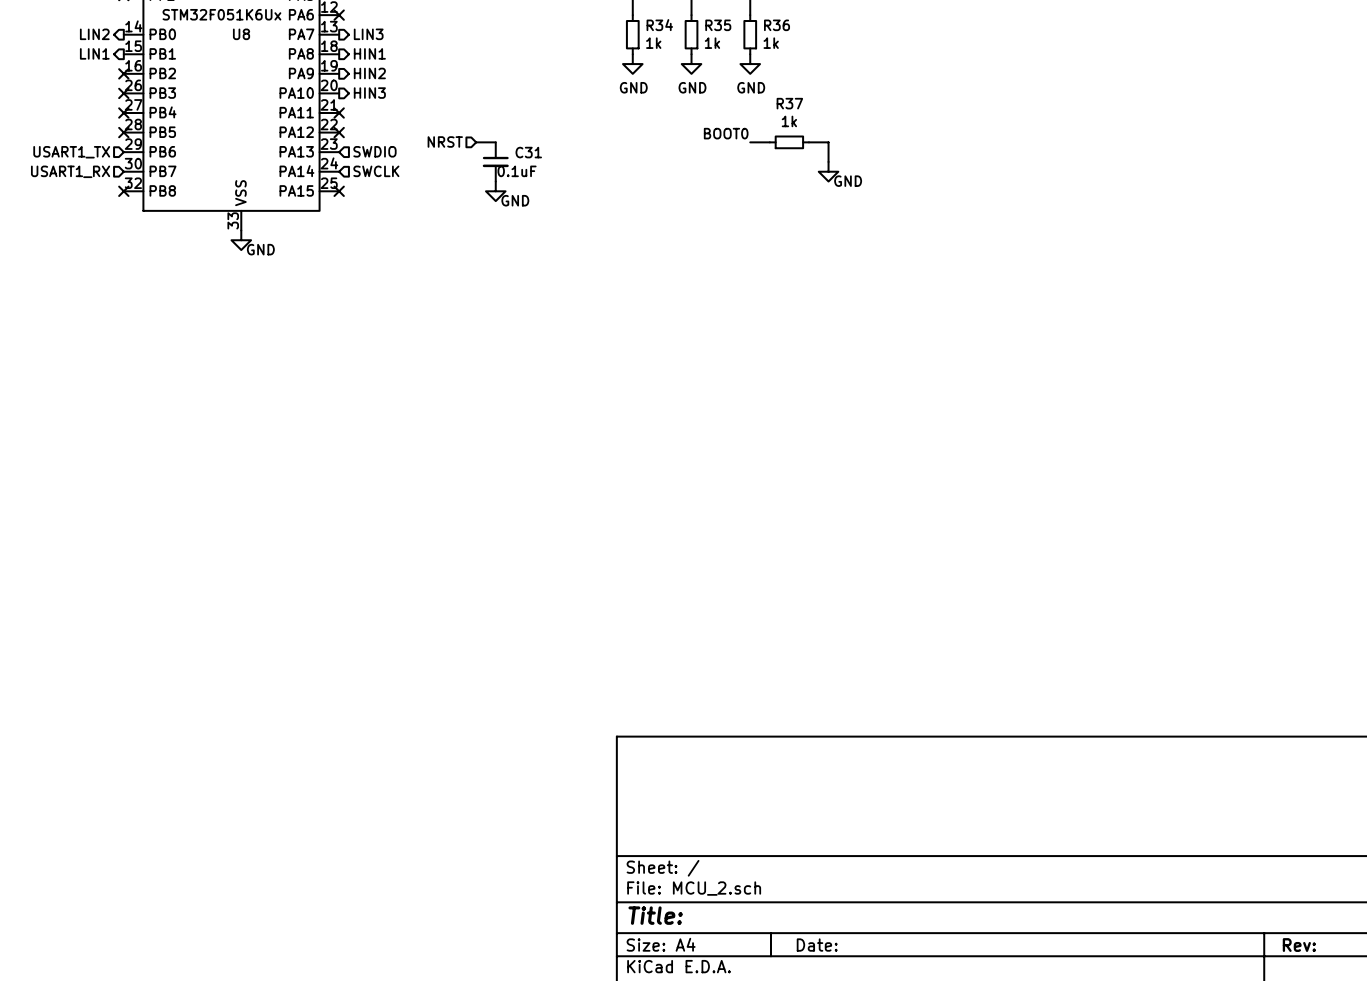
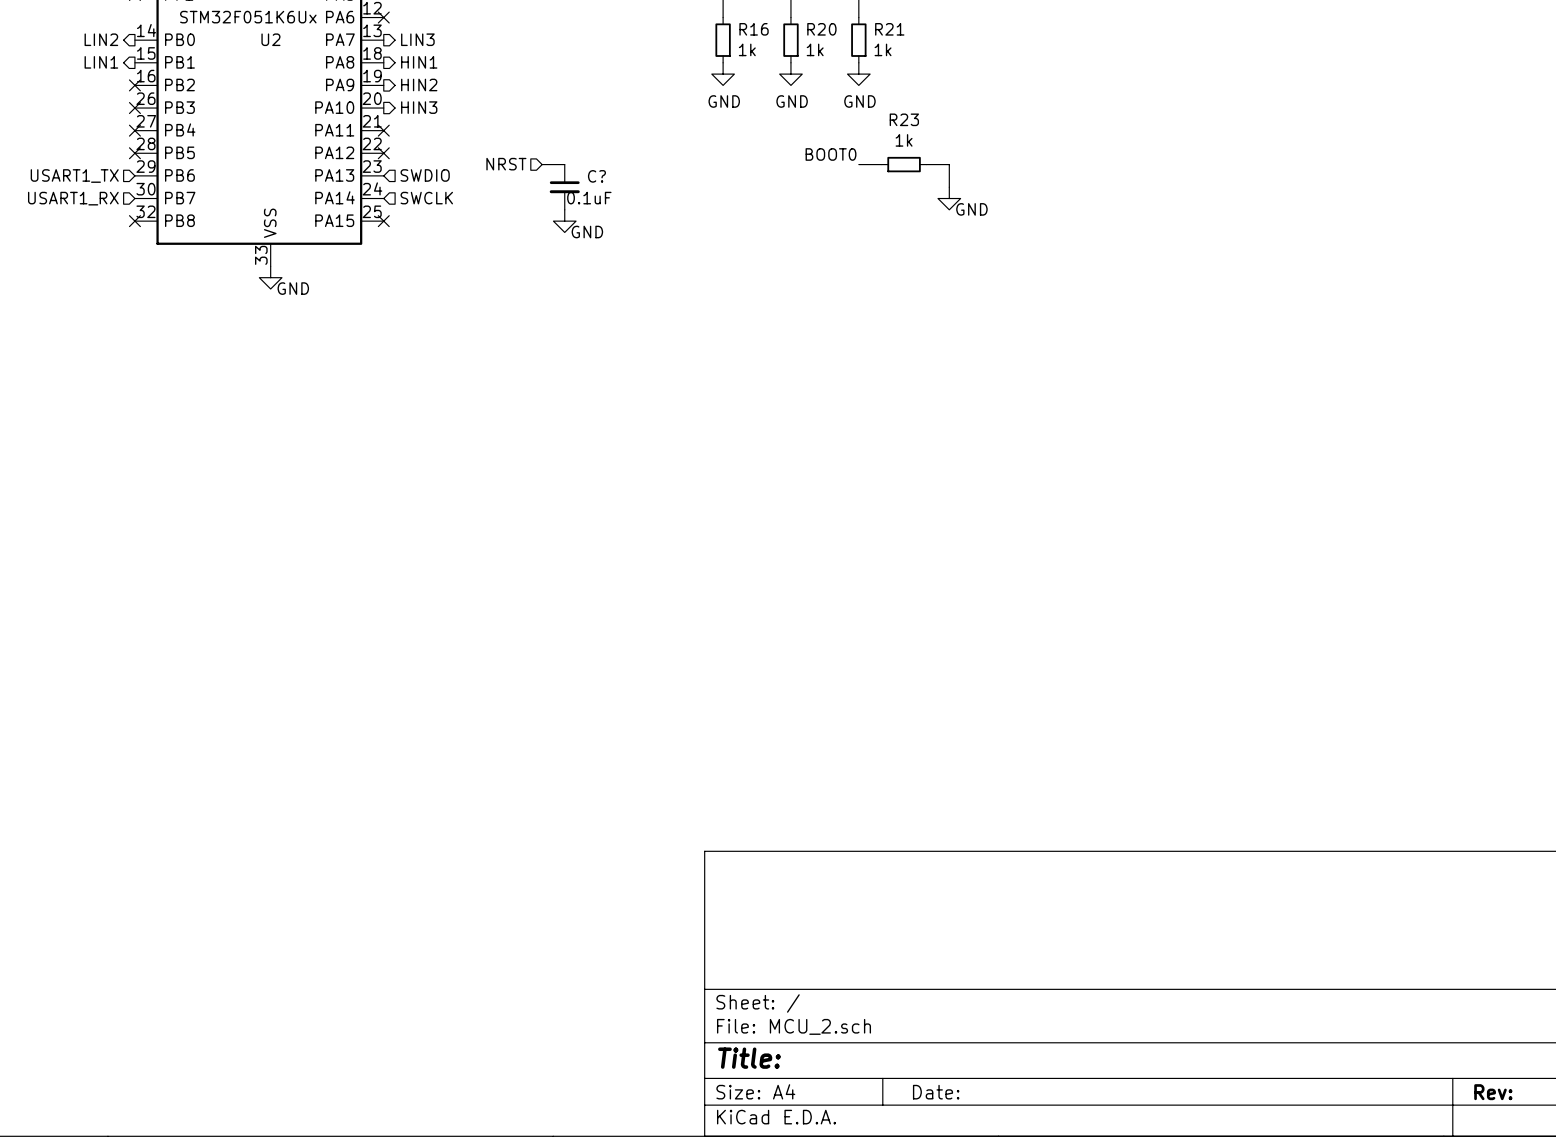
R34 name: R34 (659, 25) -> R16 (754, 29)
R35 name: R35 (718, 25) -> R20 (821, 29)
R36 name: R36 (777, 25) -> R21 (889, 29)
U8 name: U8 (241, 34) -> U2 (270, 39)
R37 name: R37 (789, 103) -> R23 (904, 119)
C31 name: C31 (528, 152) -> C? (596, 176)

